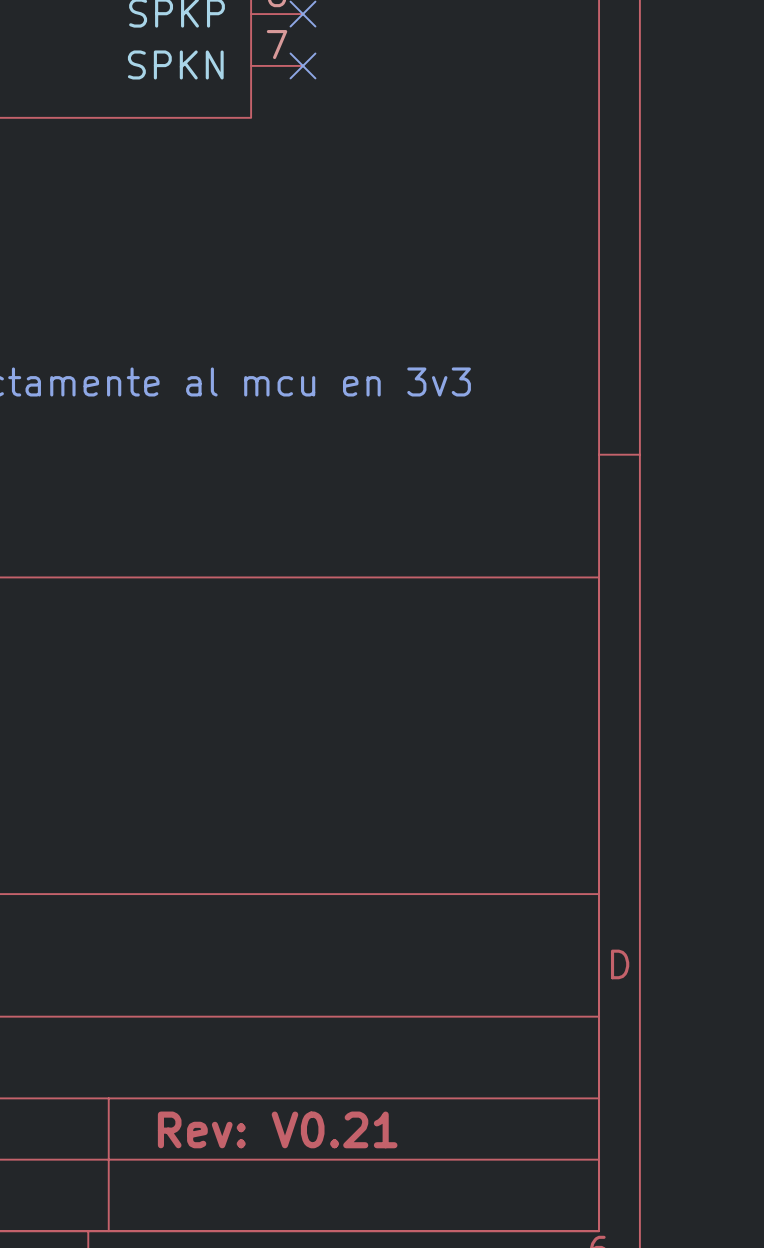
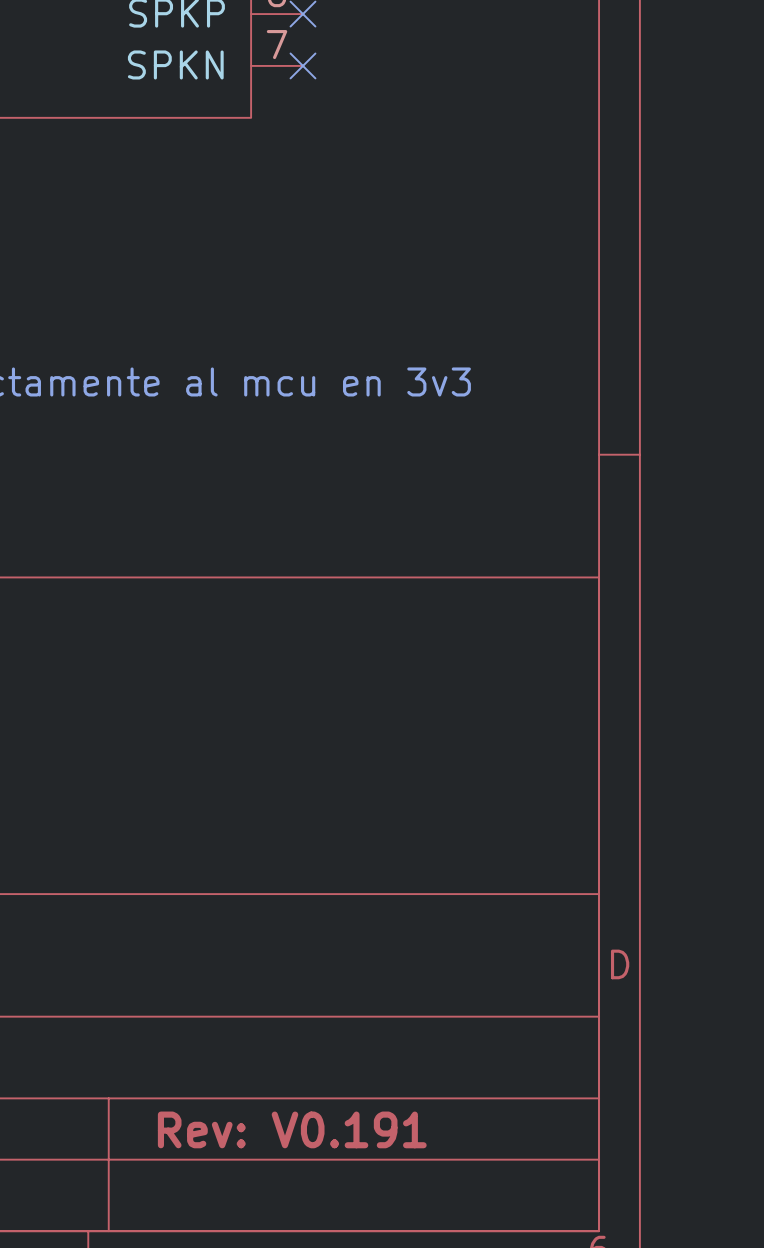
title block: Rev: V0.21 (277, 1129) -> Rev: V0.191 (292, 1129)

